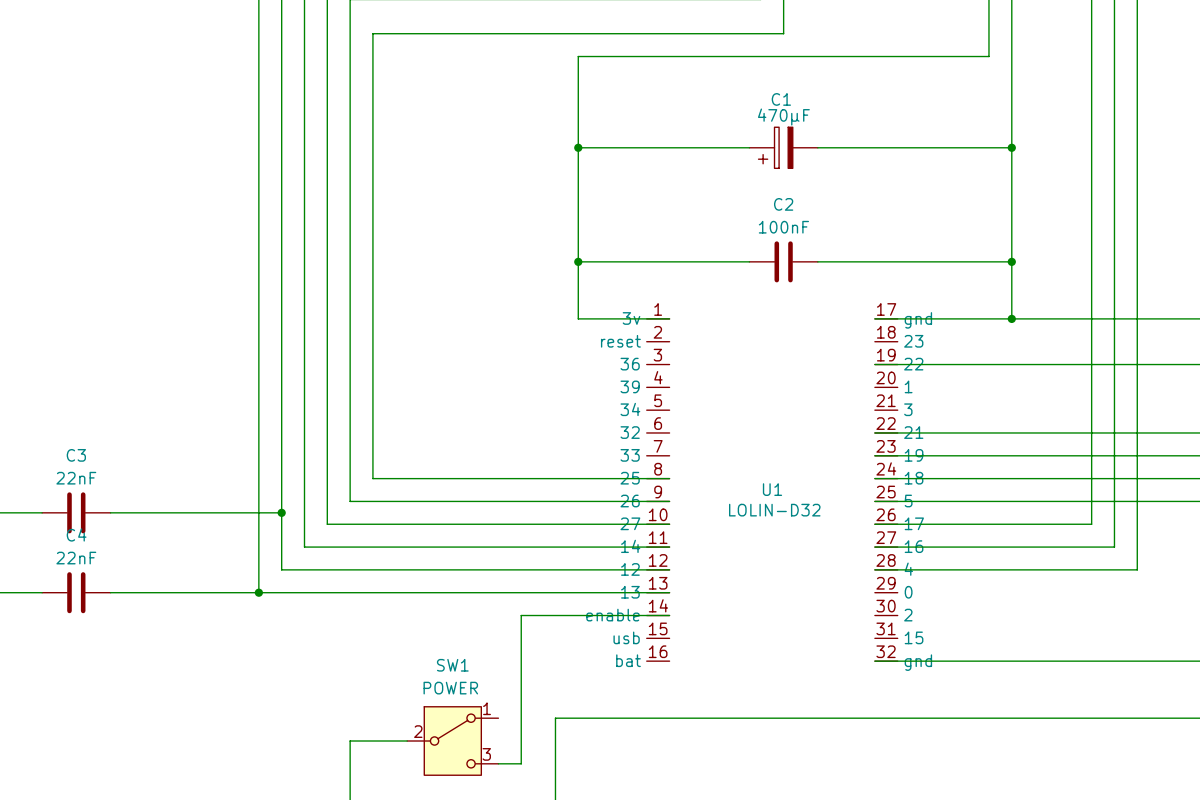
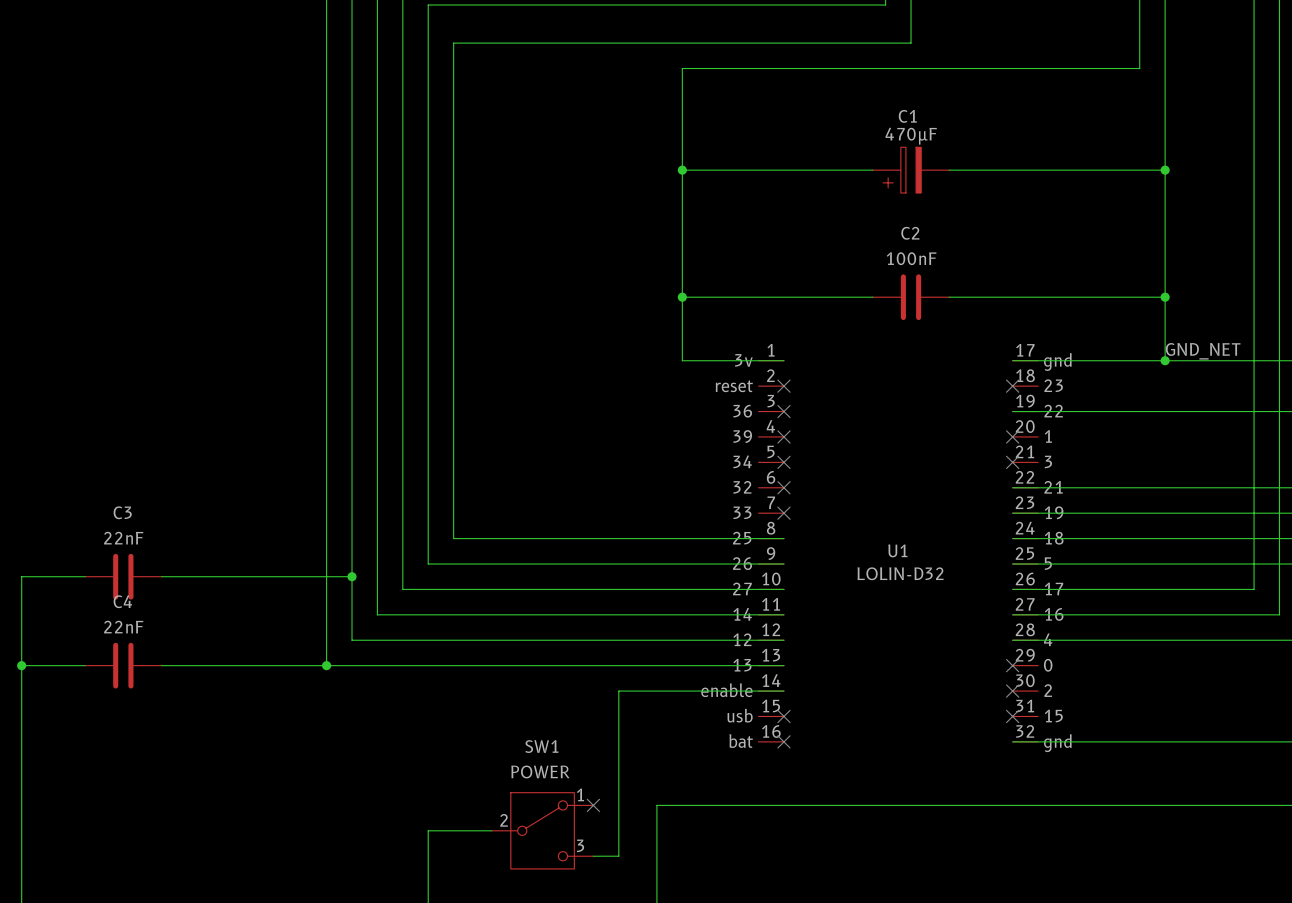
label: none -> GND_NET (1203, 351)
no-connect mark: none -> (783, 386)
no-connect mark: none -> (1012, 386)
no-connect mark: none -> (783, 411)
no-connect mark: none -> (783, 436)
no-connect mark: none -> (1012, 436)
no-connect mark: none -> (783, 462)
no-connect mark: none -> (1012, 462)
no-connect mark: none -> (783, 487)
no-connect mark: none -> (783, 513)
no-connect mark: none -> (1012, 665)
no-connect mark: none -> (1012, 691)
no-connect mark: none -> (783, 716)
no-connect mark: none -> (1012, 716)
no-connect mark: none -> (783, 741)
no-connect mark: none -> (593, 805)

